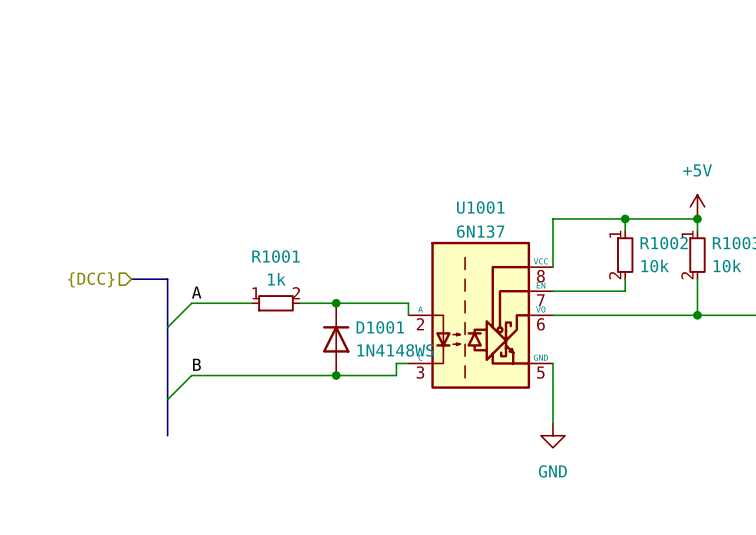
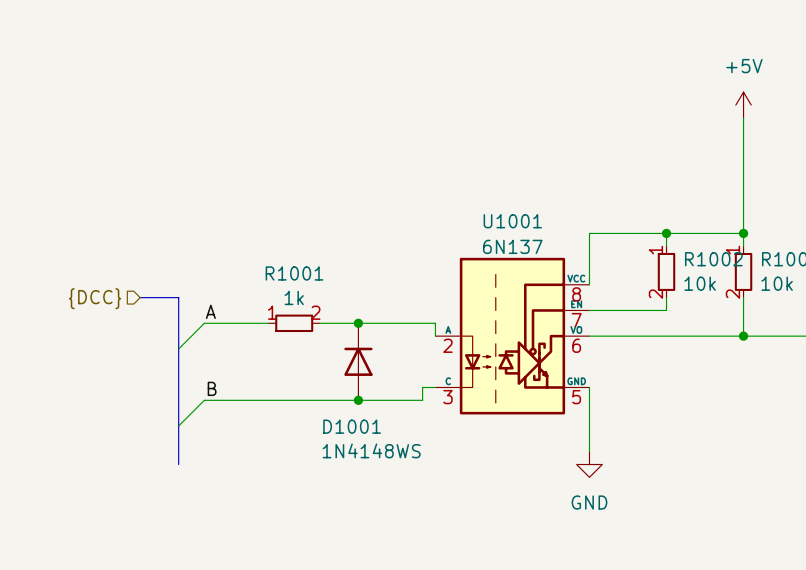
wire: none -> (743, 117) (743, 233)
power symbol position: +5V (697, 206) -> +5V (743, 105)
D1001 name position: D1001 (380, 327) -> D1001 (352, 426)
D1001 value position: 1N4148WS (395, 350) -> 1N4148WS (371, 450)

